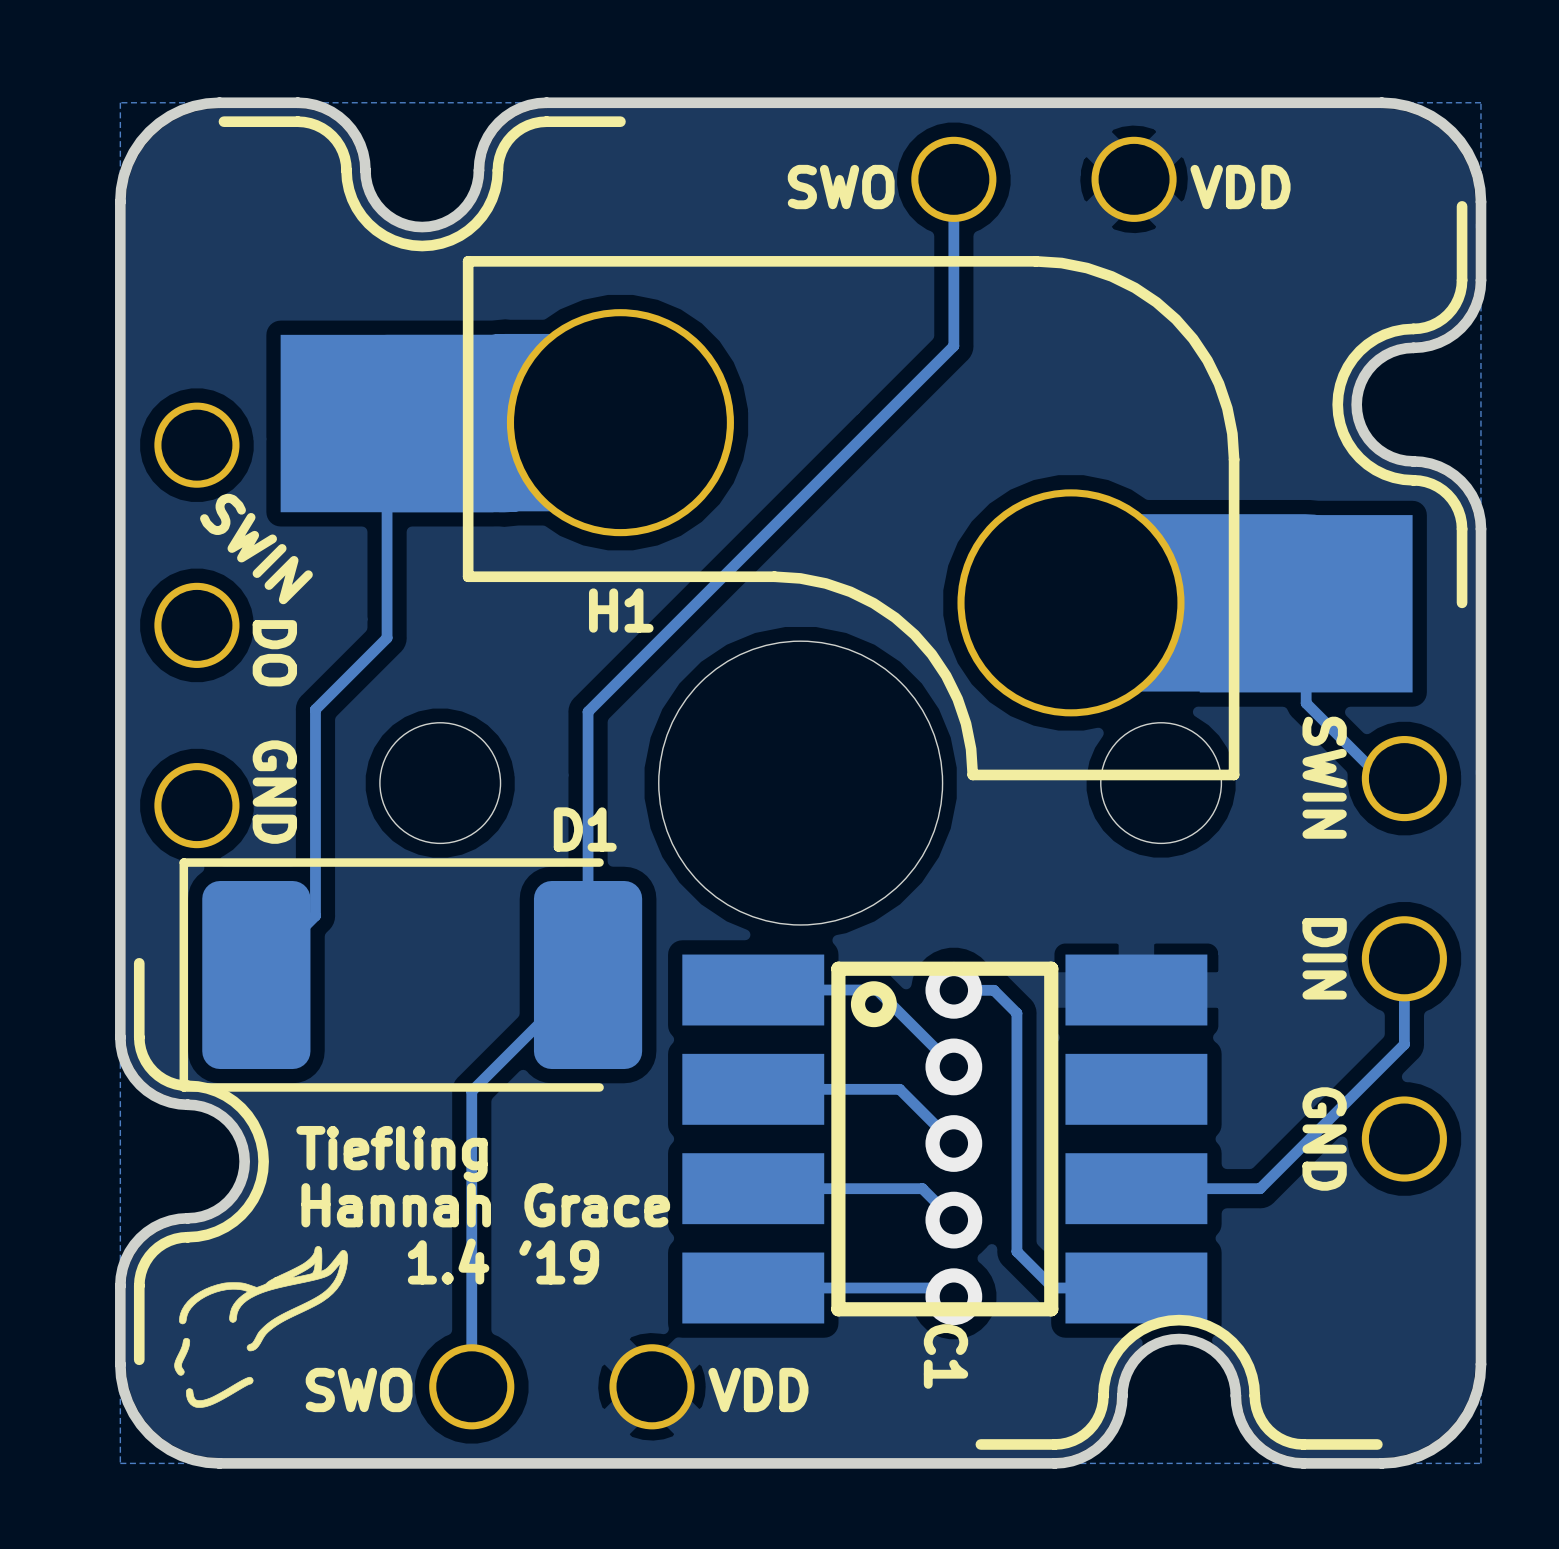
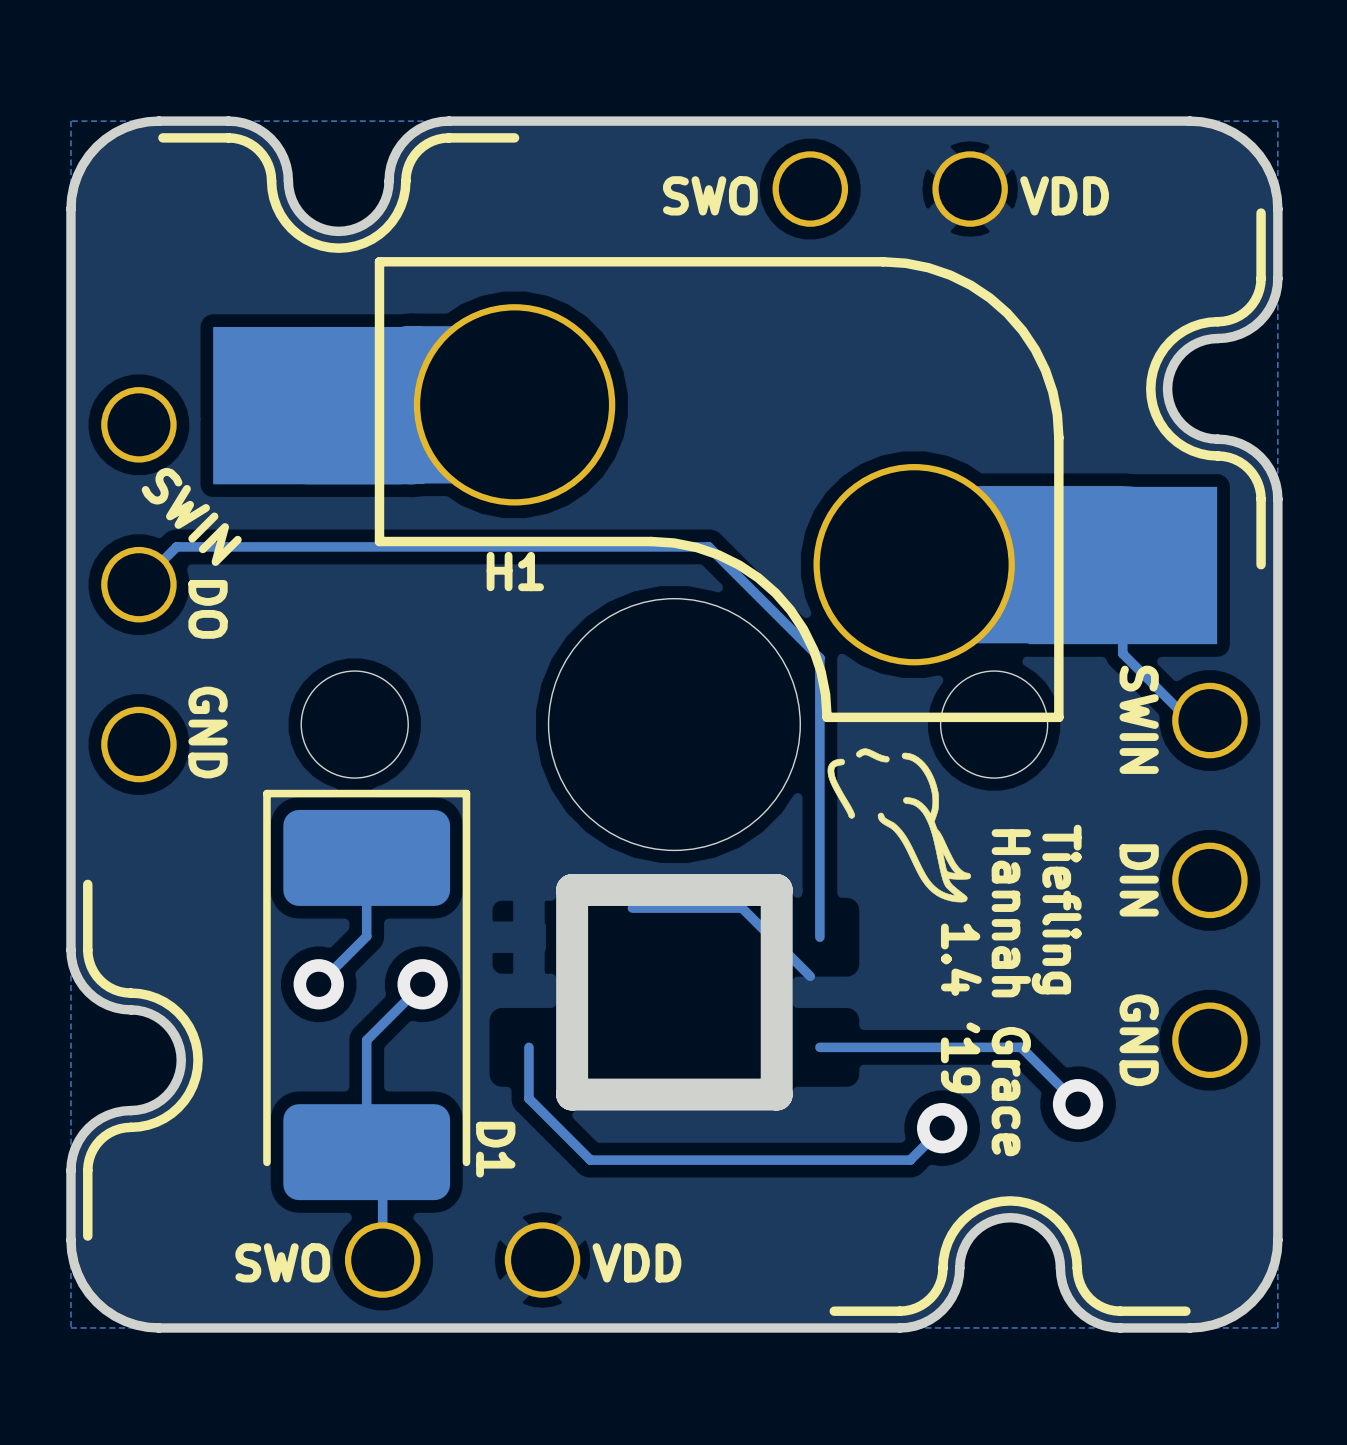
track: (953, 179) (953, 346) (588, 711) (588, 975) (471, 1091) (471, 1283) -> (422, 984) (366, 1040) (366, 1152) (382, 1168)
track: (350, 460) (387, 423) (387, 638) (315, 709) (315, 915) (256, 975) -> none
track: none -> (138, 584) (176, 546) (708, 546) (819, 658) (819, 937)
drawing: none -> [827, 748, 972, 903]
track: none -> (366, 857) (366, 936) (318, 984)
track: (1404, 958) (1404, 1044) (1260, 1188) (1136, 1188) -> none
board edge: none -> (776, 889) (776, 1094) (572, 1094) (572, 889) (776, 889)
D1 rotation: 0° (410, 975) -> 90° clockwise (366, 994)
track: (953, 990) (993, 990) (1016, 1013) (1016, 1251) (1053, 1288) (1136, 1288) -> none
via: (953, 990) -> none
via: (953, 1066) -> none
via: none -> (318, 984)
via: none -> (422, 984)
track: (771, 1107) (753, 1089) (899, 1089) (953, 1143) -> none
C1: (944, 1139) -> none
via: (953, 1143) -> none
track: none -> (528, 1047) (528, 1098) (590, 1160) (910, 1160) (942, 1128)
track: none -> (819, 1047) (1021, 1047) (1078, 1104)
text rotation: 0° (391, 1154) -> 90° clockwise (1056, 909)
text position: Tiefling (391, 1154) -> Tiefling (1056, 909)
track: (753, 1188) (922, 1188) (953, 1220) -> none
text rotation: 0° (485, 1205) -> 90° clockwise (1011, 992)
text position: Hannah Grace (485, 1205) -> Hannah Grace (1011, 992)
via: none -> (1078, 1104)
via: (953, 1220) -> none
via: none -> (942, 1128)
drawing: [174, 1246, 348, 1408] -> none
text rotation: 0° (503, 1261) -> 90° clockwise (961, 1008)
text position: 1.4 '19 (503, 1261) -> 1.4 '19 (961, 1008)
track: (753, 1288) (945, 1288) (953, 1296) -> none
via: (953, 1296) -> none

